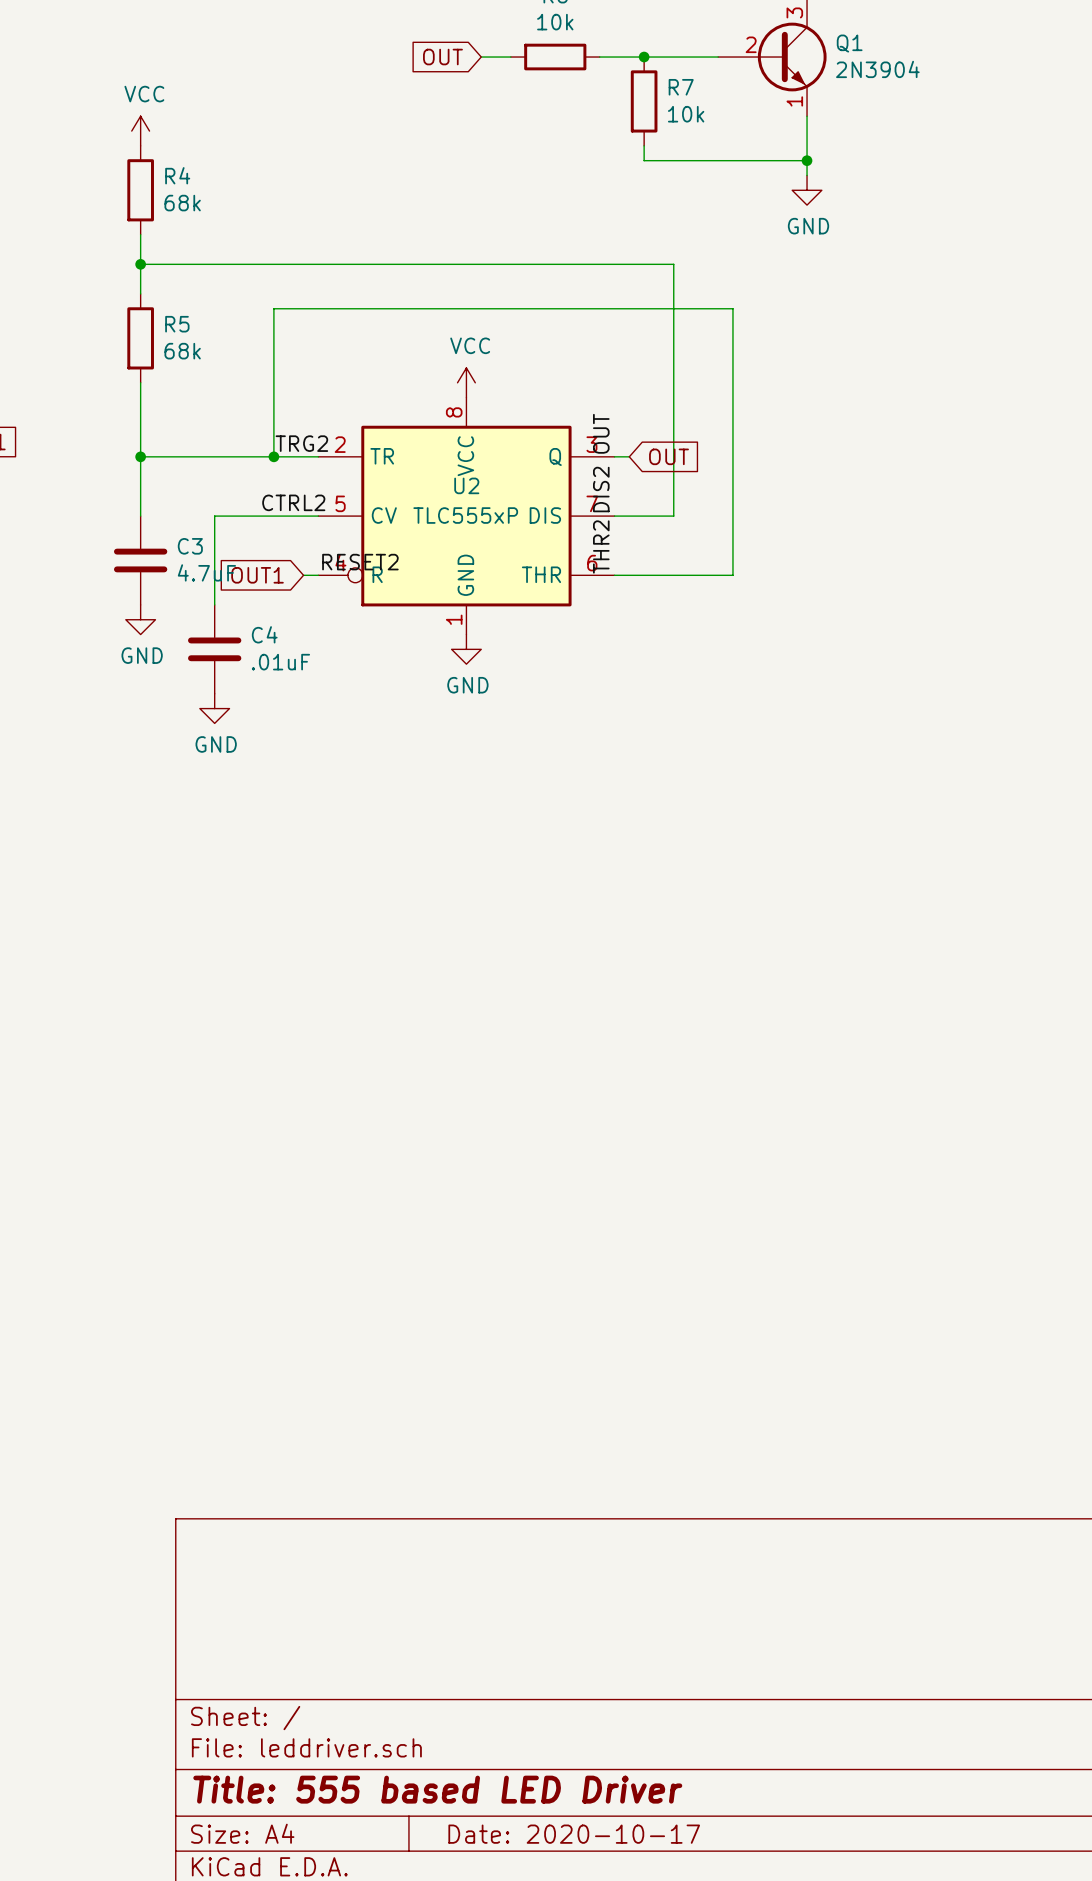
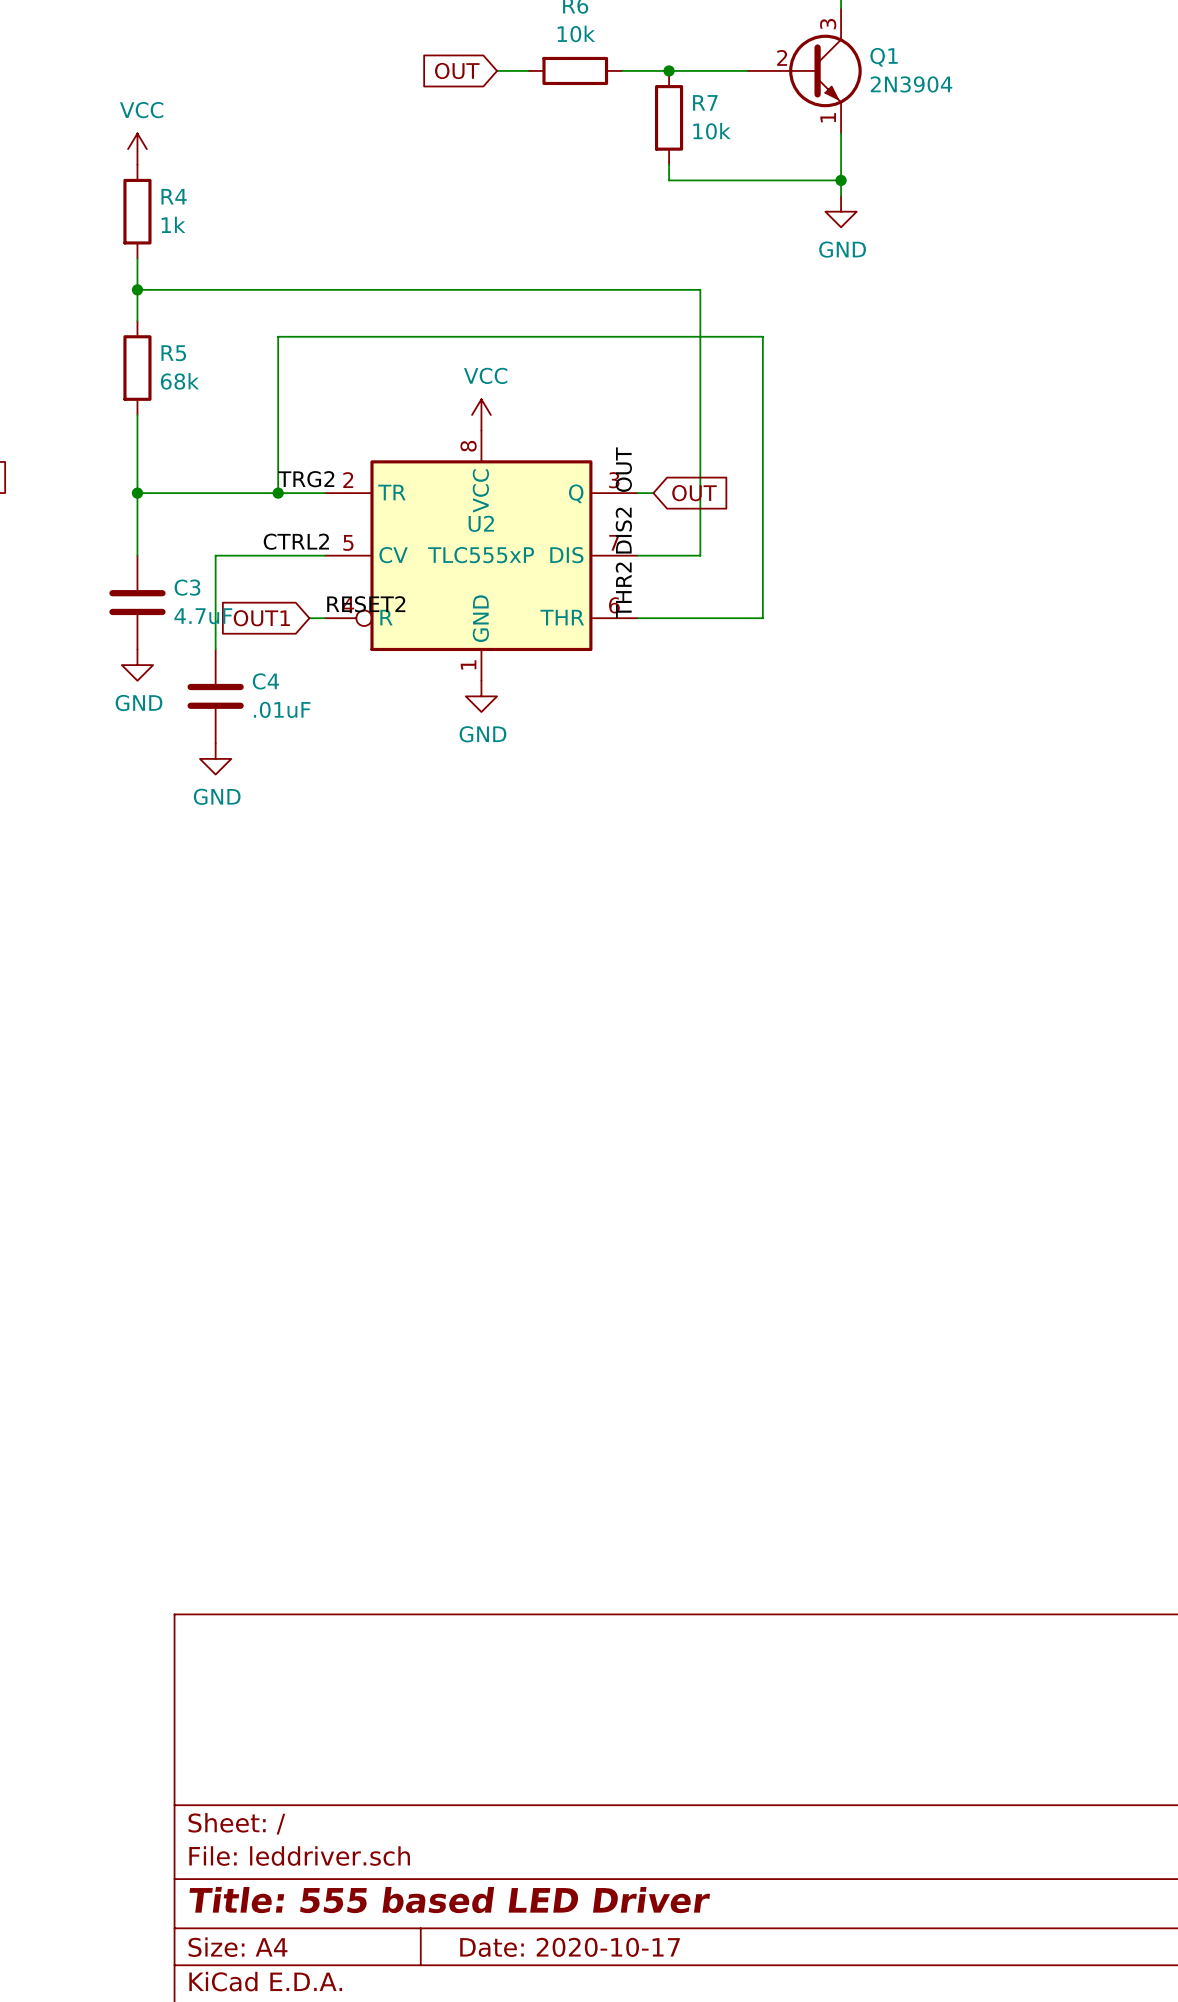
R4 value: 68k (182, 203) -> 1k (173, 224)

